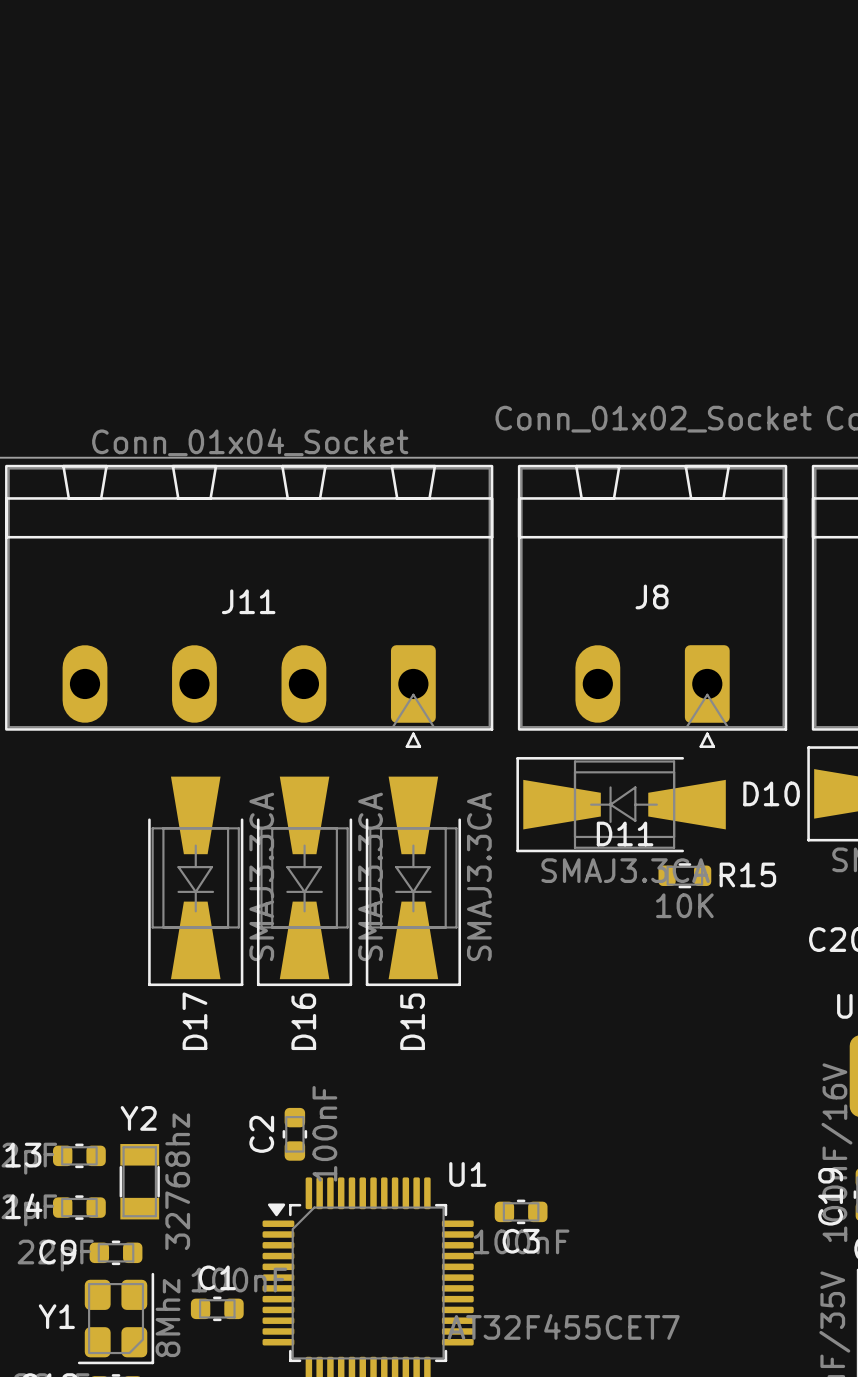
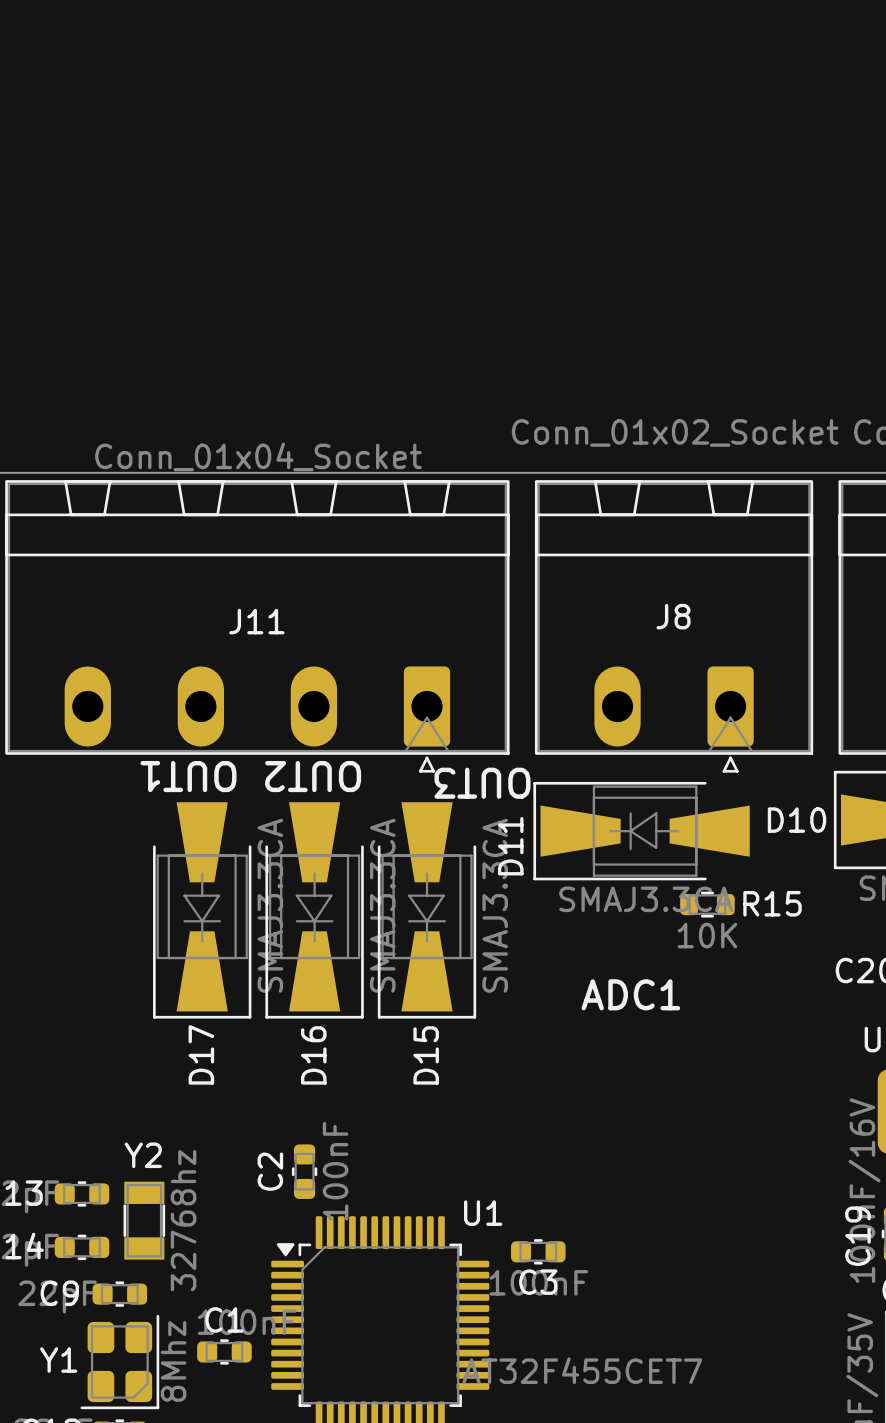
text: none -> OUT1 (188, 776)
text: none -> OUT2 (313, 776)
text: none -> OUT3 (482, 783)
D11 name rotation: 0° (625, 834) -> 90° counterclockwise (510, 846)
D11 name position: D11 (625, 834) -> D11 (510, 846)
text: none -> ADC1 (630, 994)

